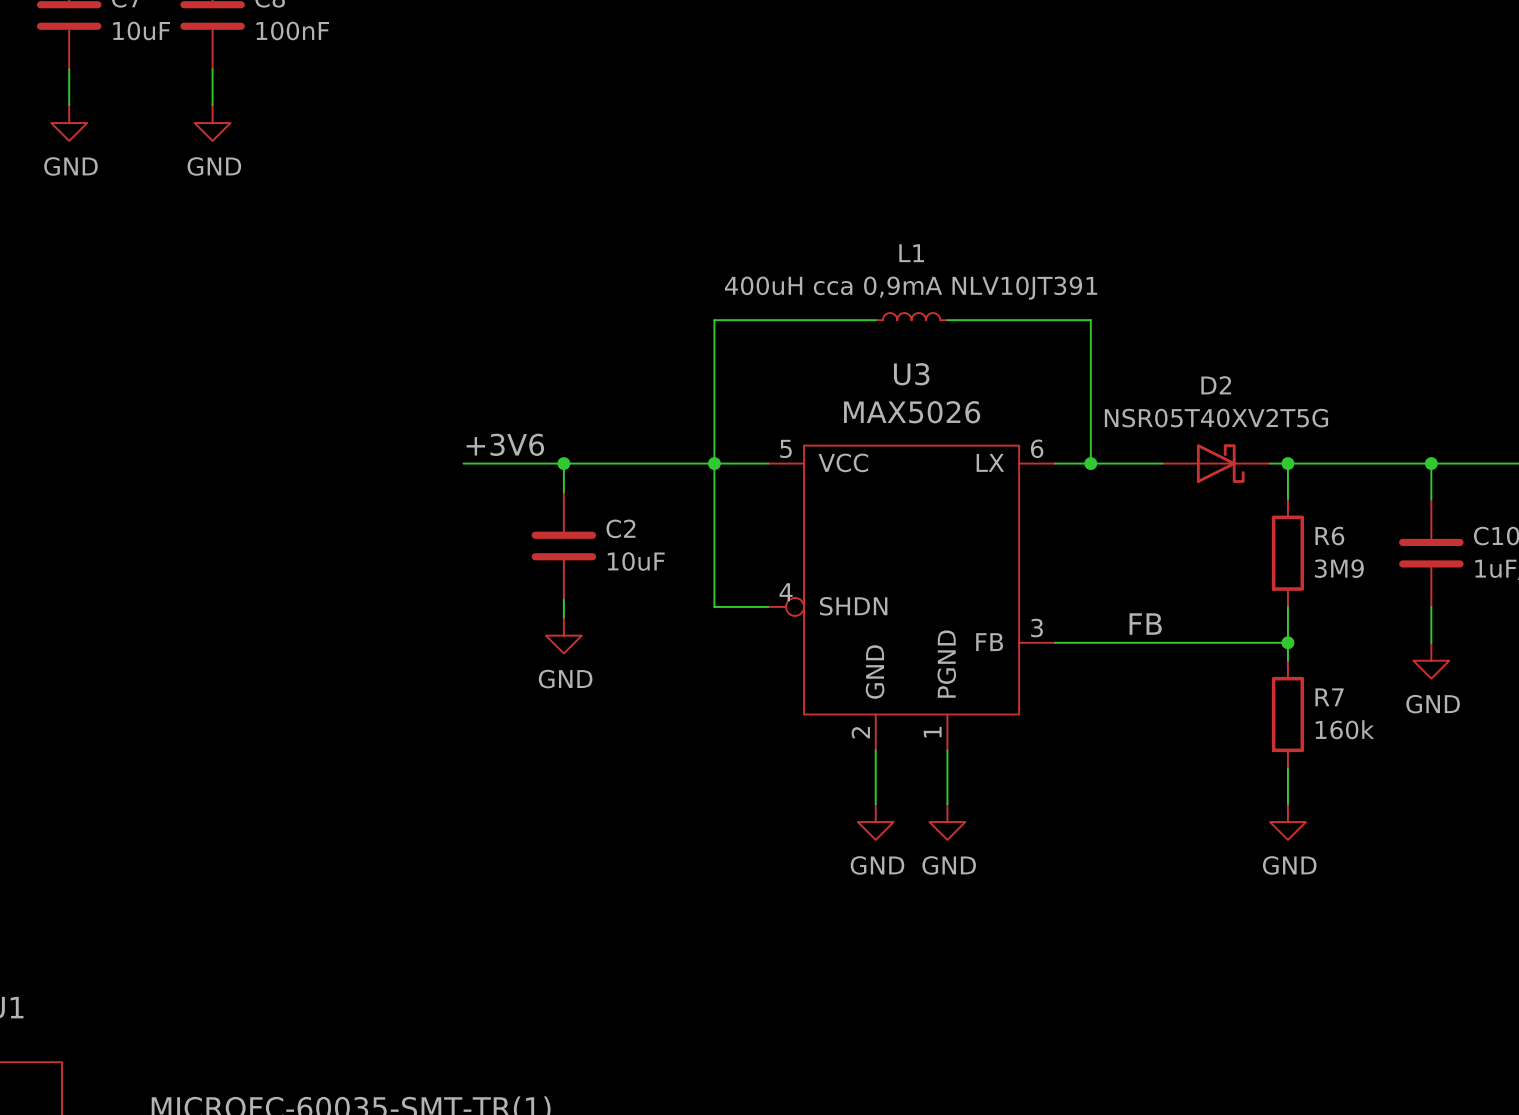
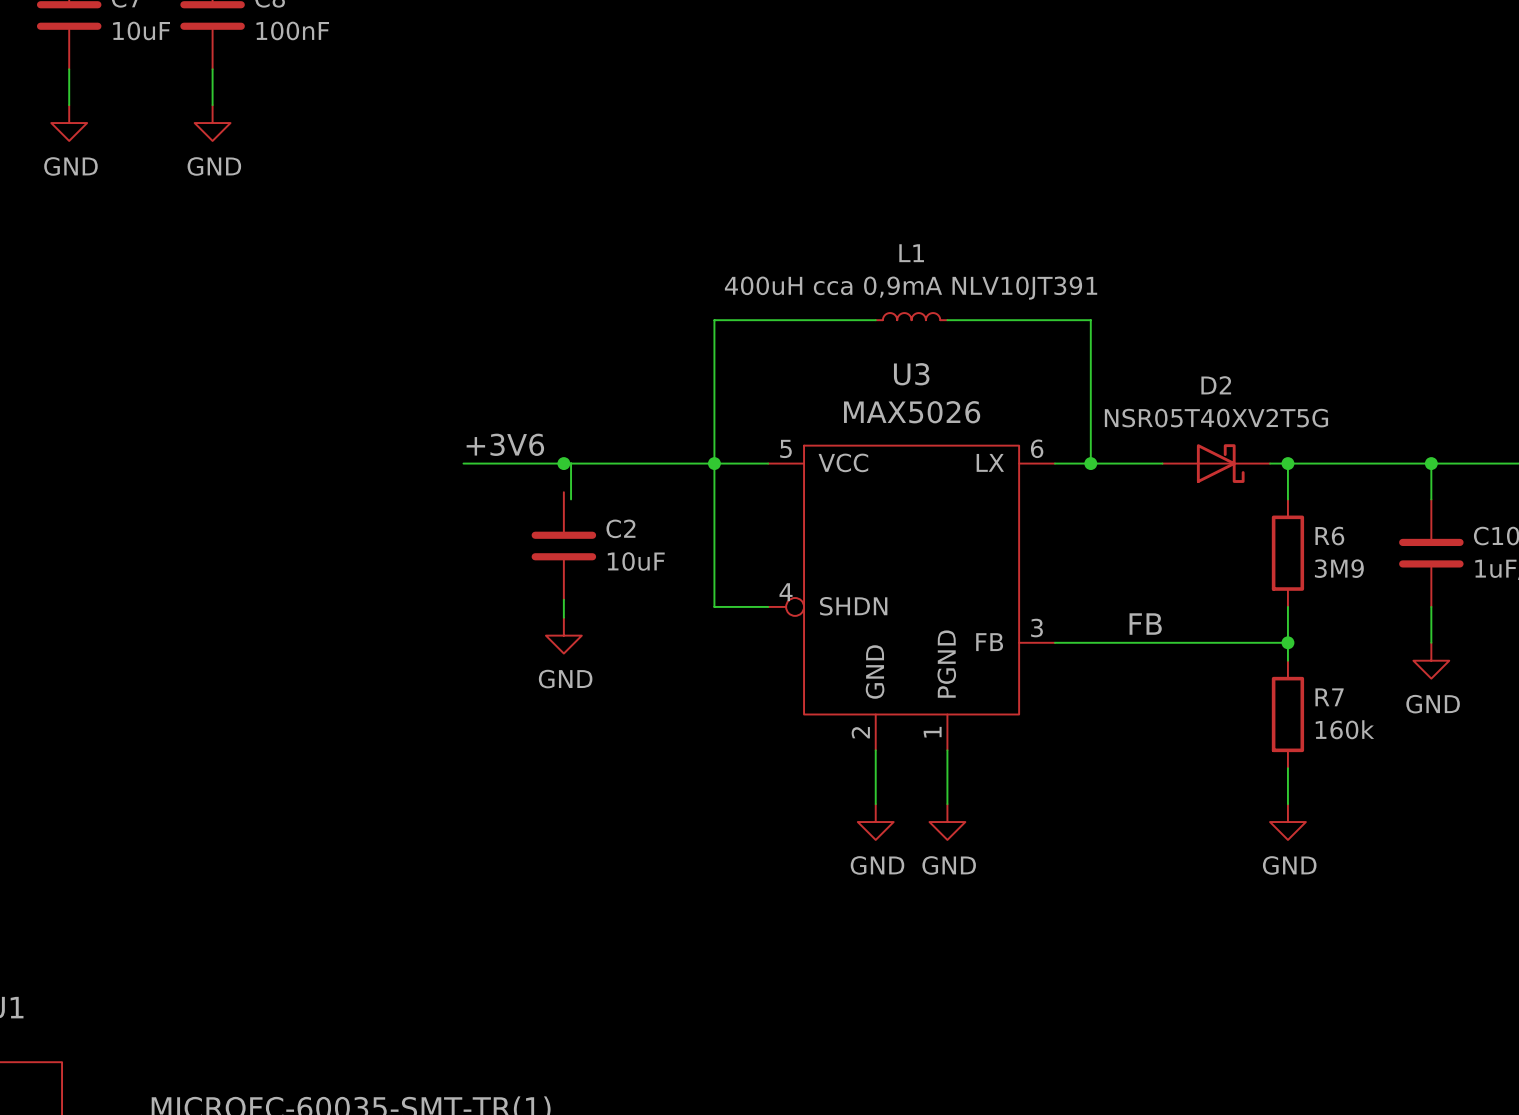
wire: (563, 463) (563, 492) -> none
wire: none -> (571, 463) (571, 499)

